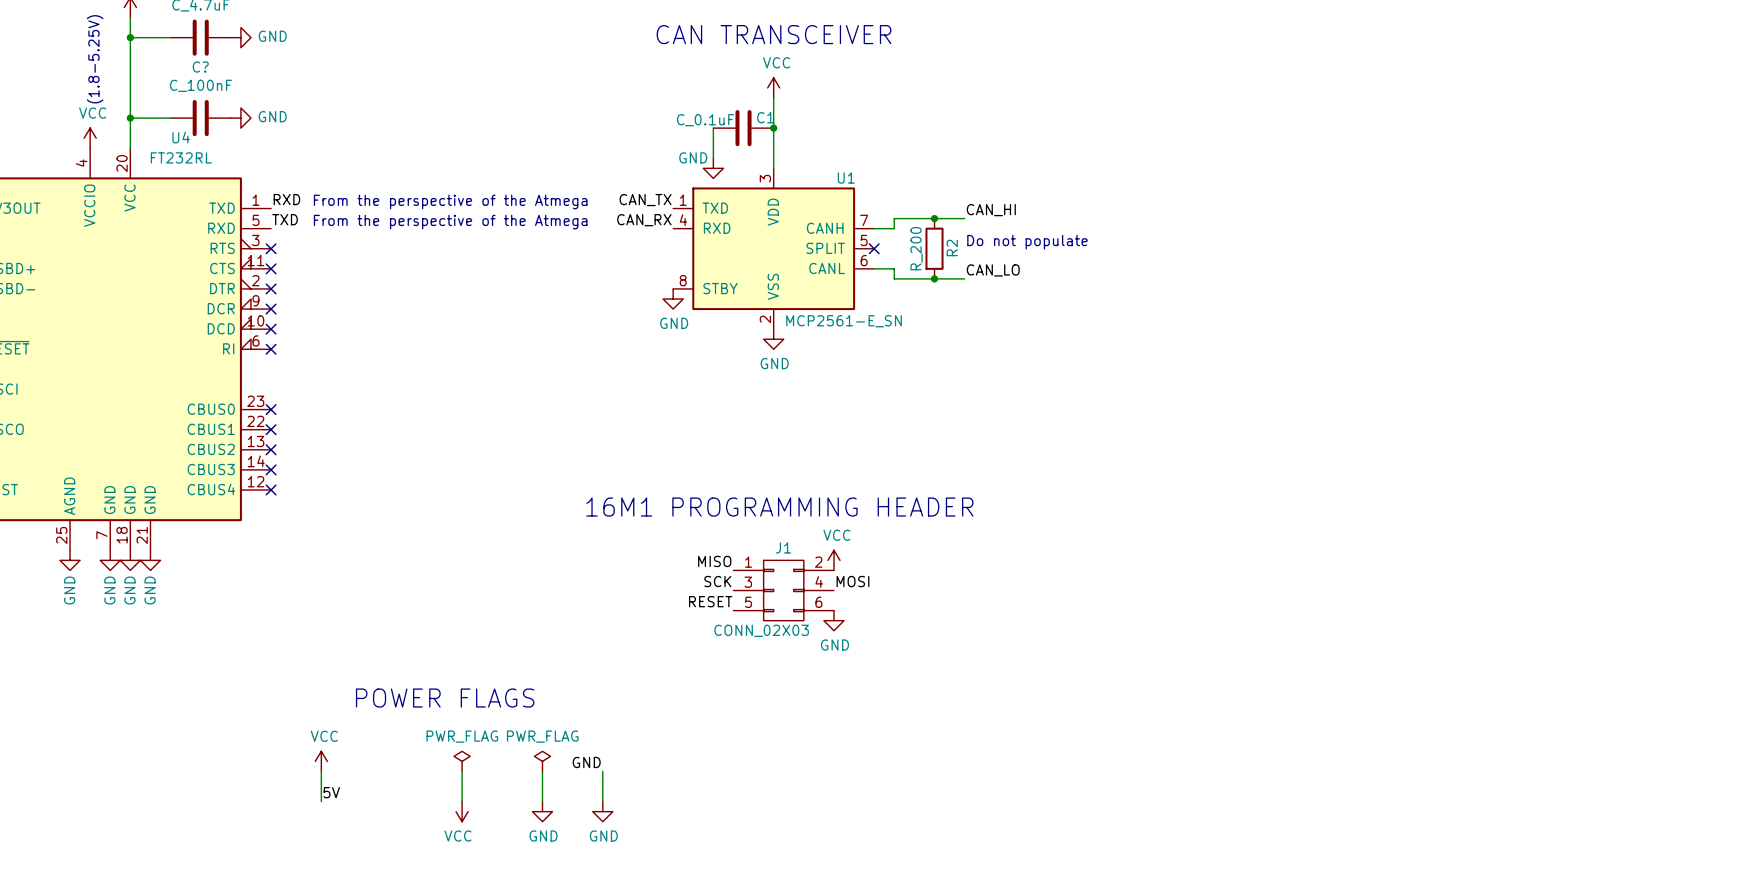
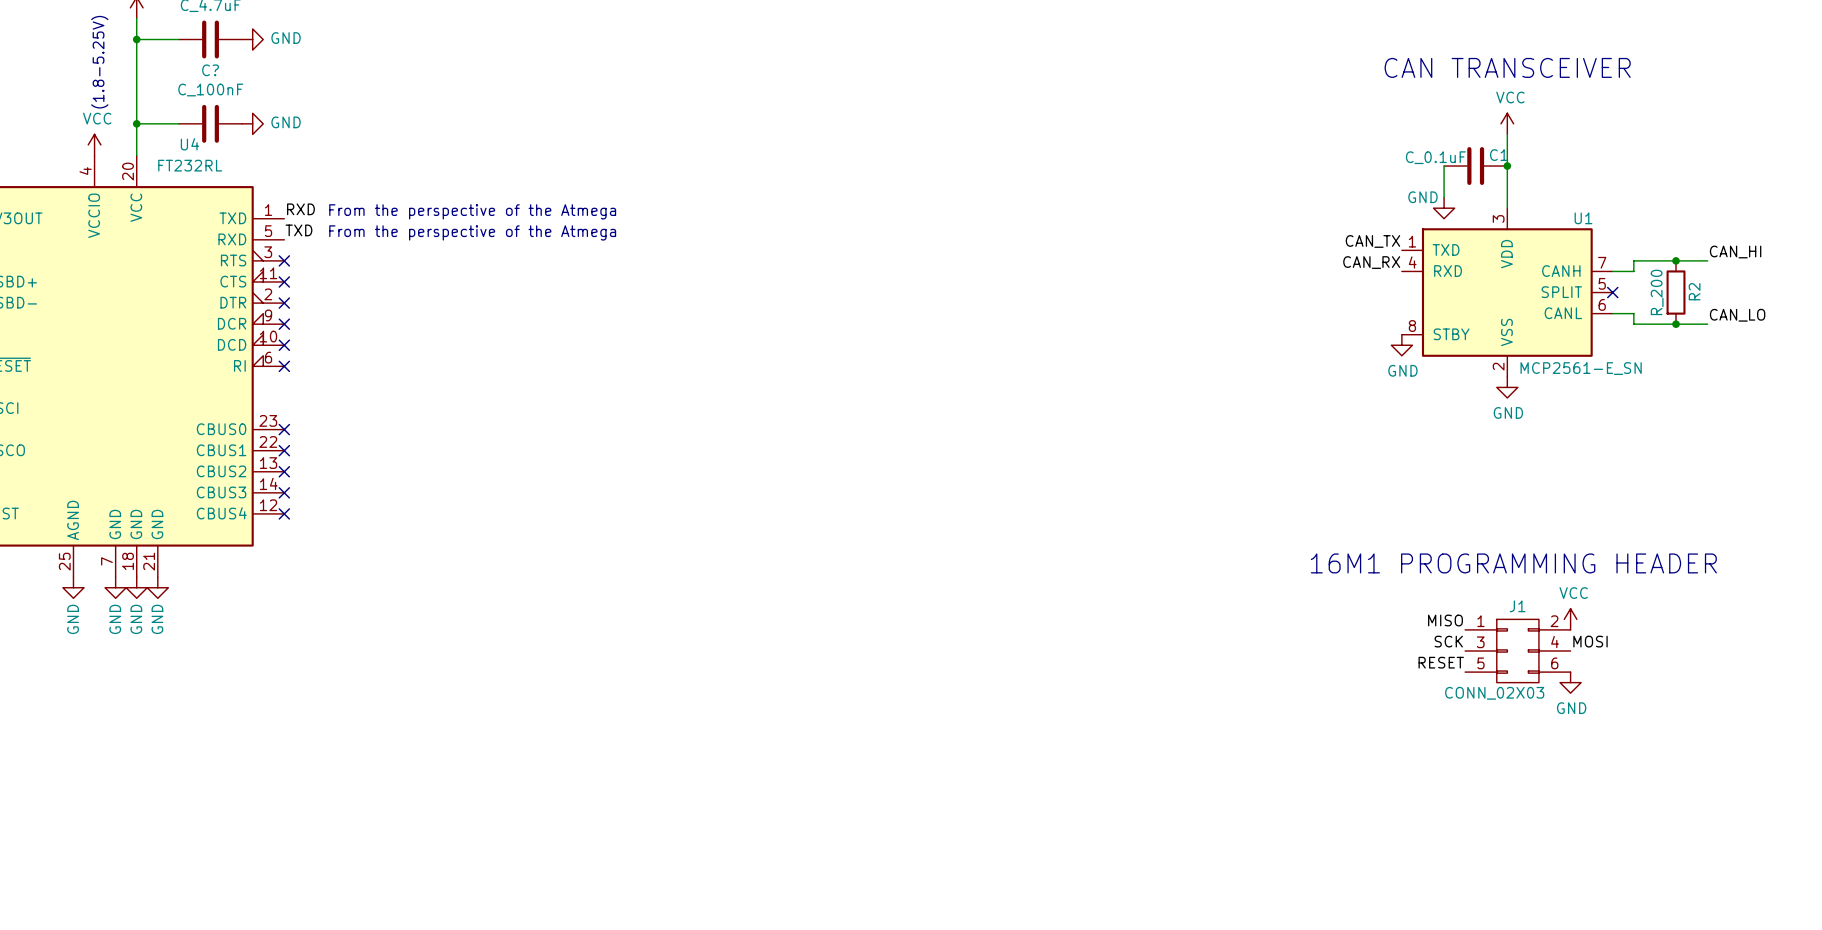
text: CAN TRANSCEIVER (773, 34) -> none
text: none -> CAN TRANSCEIVER (1507, 67)
power symbol: VCC (773, 87) -> none
wire: (773, 97) (773, 168) -> none
power symbol: none -> VCC (1507, 123)
wire: (713, 128) (713, 158) -> none
C1 position: (743, 128) -> (1475, 166)
junction: (773, 128) -> none
wire: none -> (1507, 134) (1507, 208)
wire: none -> (1444, 166) (1444, 197)
junction: none -> (1507, 166)
power symbol: GND (713, 168) -> none
power symbol: none -> GND (1444, 208)
label: CAN_TX (645, 200) -> none
label: CAN_HI (991, 210) -> none
junction: (934, 218) -> none
wire: (964, 218) (894, 218) (894, 228) (874, 228) -> none
label: CAN_RX (644, 220) -> none
label: none -> CAN_TX (1372, 241)
label: none -> CAN_HI (1735, 252)
text: Do not populate (1027, 242) -> none
U1 position: (773, 248) -> (1507, 292)
no-connect mark: (874, 248) -> none
R2 position: (934, 248) -> (1676, 292)
junction: none -> (1676, 260)
wire: none -> (1707, 260) (1633, 260) (1633, 271) (1612, 271)
label: none -> CAN_RX (1371, 262)
wire: (874, 268) (894, 268) (894, 278) (964, 278) -> none
label: CAN_LO (993, 270) -> none
junction: (934, 278) -> none
no-connect mark: none -> (1612, 292)
power symbol: GND (673, 299) -> none
wire: none -> (1612, 313) (1633, 313) (1633, 324) (1707, 324)
label: none -> CAN_LO (1737, 315)
junction: none -> (1676, 324)
power symbol: none -> GND (1401, 345)
power symbol: GND (773, 339) -> none
power symbol: none -> GND (1507, 387)
text: 16M1 PROGRAMMING HEADER (779, 507) -> none
text: none -> 16M1 PROGRAMMING HEADER (1513, 563)
power symbol: VCC (833, 560) -> none
label: MISO (714, 561) -> none
label: SCK (717, 581) -> none
label: MOSI (852, 581) -> none
J1 position: (783, 590) -> (1517, 651)
power symbol: none -> VCC (1570, 619)
label: none -> MISO (1445, 620)
label: RESET (710, 601) -> none
label: none -> SCK (1448, 641)
label: none -> MOSI (1590, 641)
power symbol: GND (833, 620) -> none
label: none -> RESET (1441, 662)
power symbol: none -> GND (1570, 682)
text: POWER FLAGS (445, 698) -> none
power symbol: VCC (321, 761) -> none
power symbol: PWR_FLAG (462, 761) -> none
power symbol: PWR_FLAG (542, 761) -> none
label: GND (586, 762) -> none
wire: (321, 771) (321, 801) -> none
wire: (462, 771) (462, 801) -> none
wire: (542, 771) (542, 801) -> none
wire: (602, 771) (602, 801) -> none
label: 5V (331, 792) -> none
power symbol: VCC (462, 811) -> none
power symbol: GND (542, 811) -> none
power symbol: GND (602, 811) -> none

